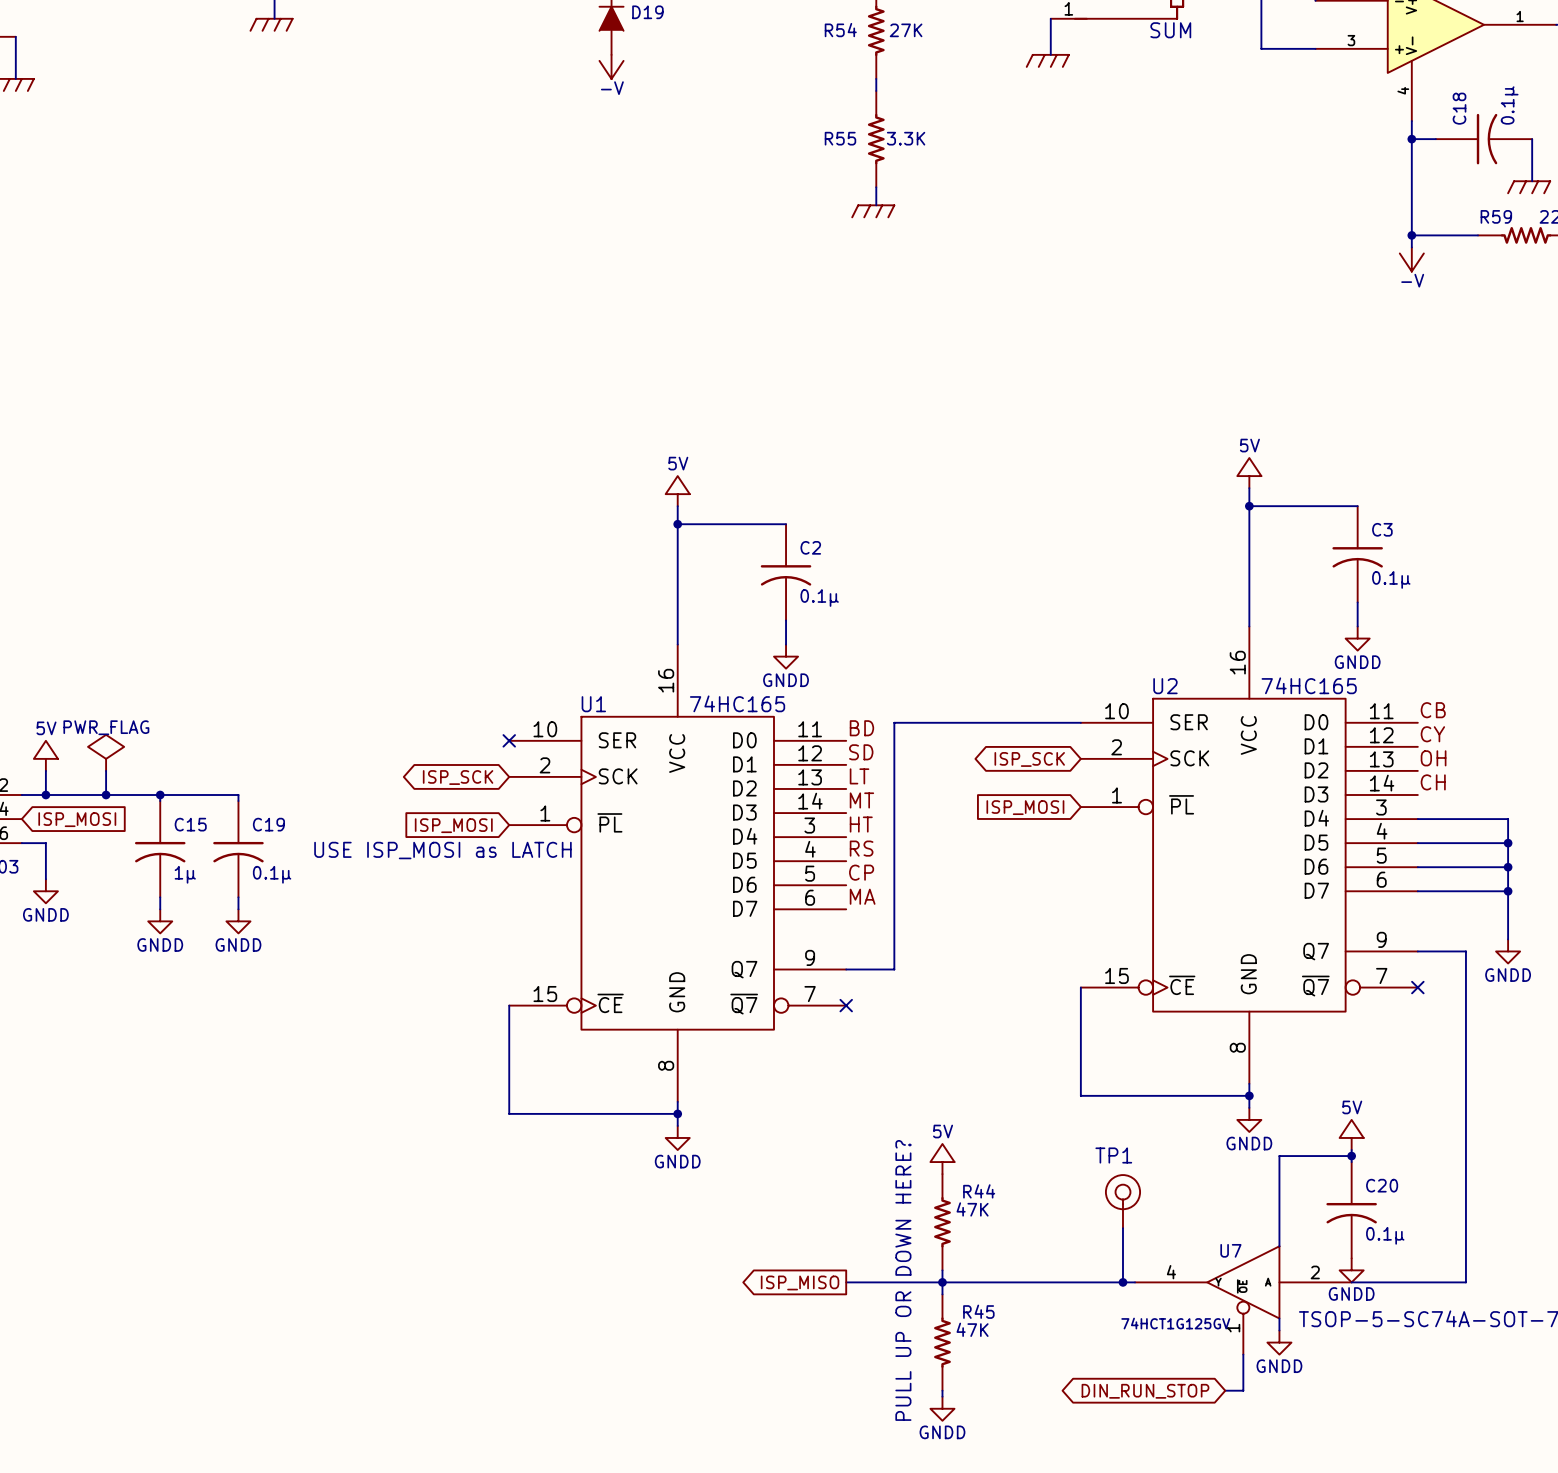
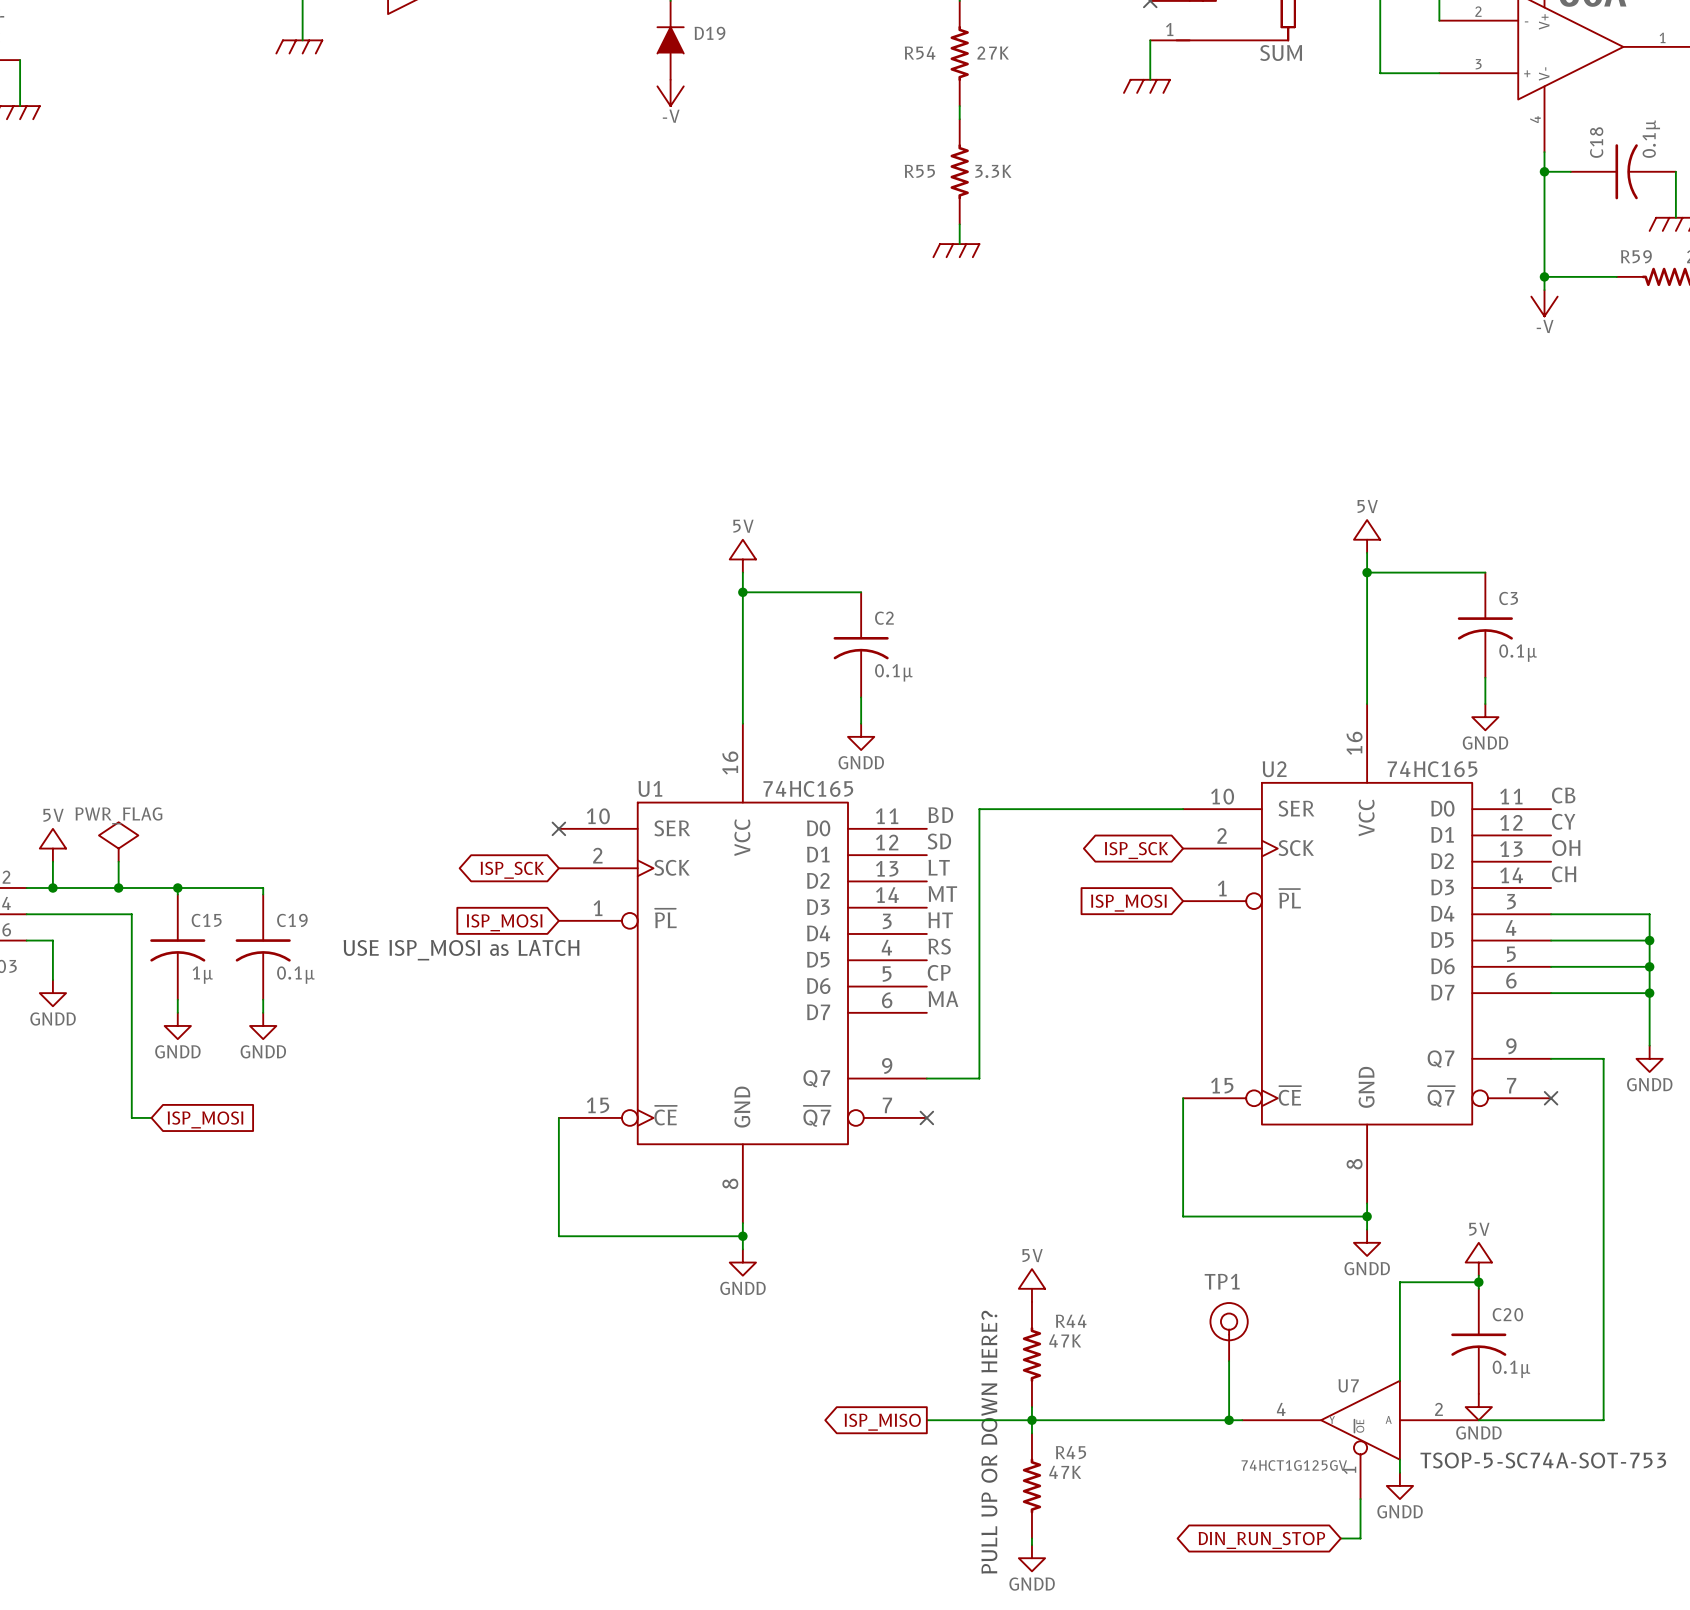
wire: none -> (26, 914) (131, 914) (131, 1117) (151, 1117)
global label position: ISP_MOSI (77, 819) -> ISP_MOSI (205, 1119)

